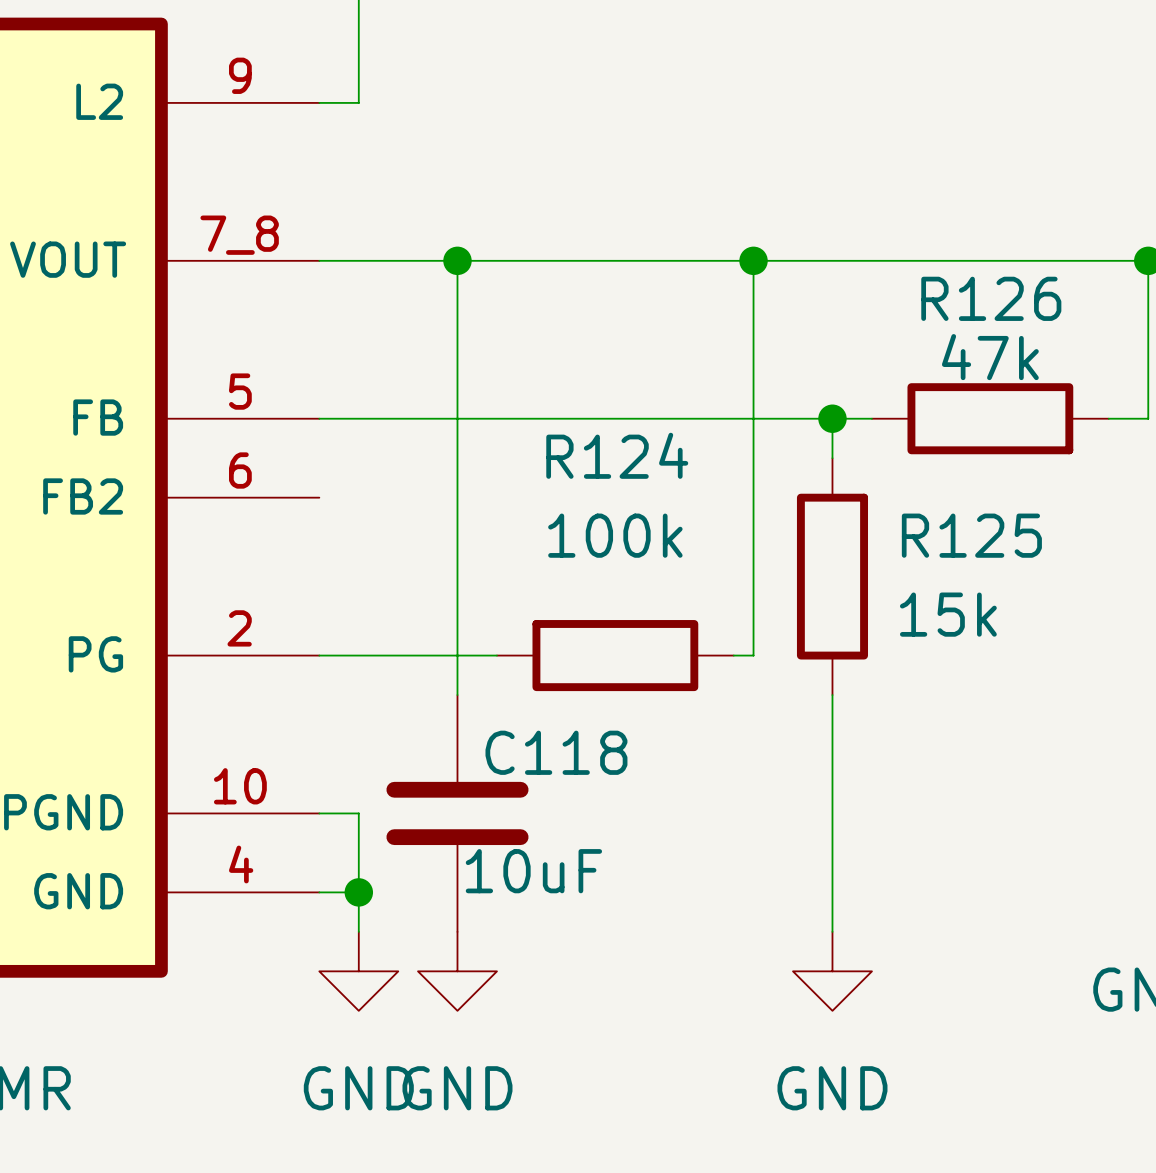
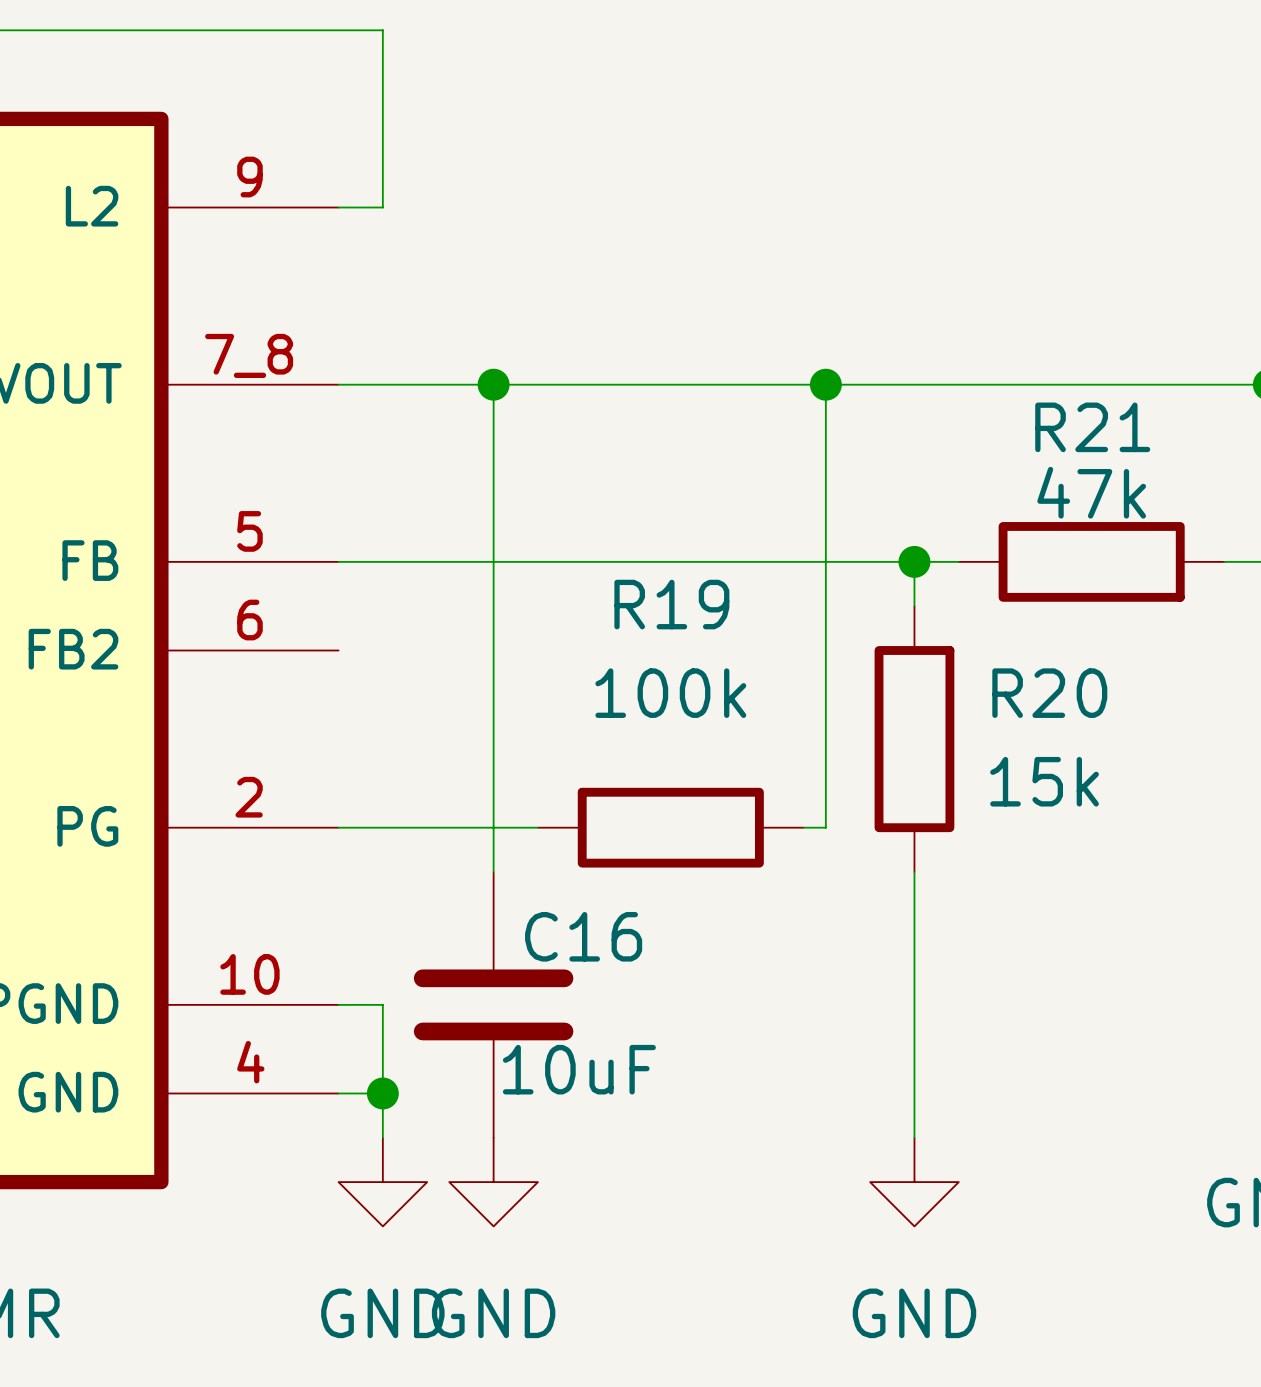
R126 name: R126 (991, 298) -> R21 (1092, 427)
R124 name: R124 (617, 455) -> R19 (671, 604)
R125 name: R125 (971, 535) -> R20 (1049, 693)
C118 name: C118 (556, 752) -> C16 (583, 936)

